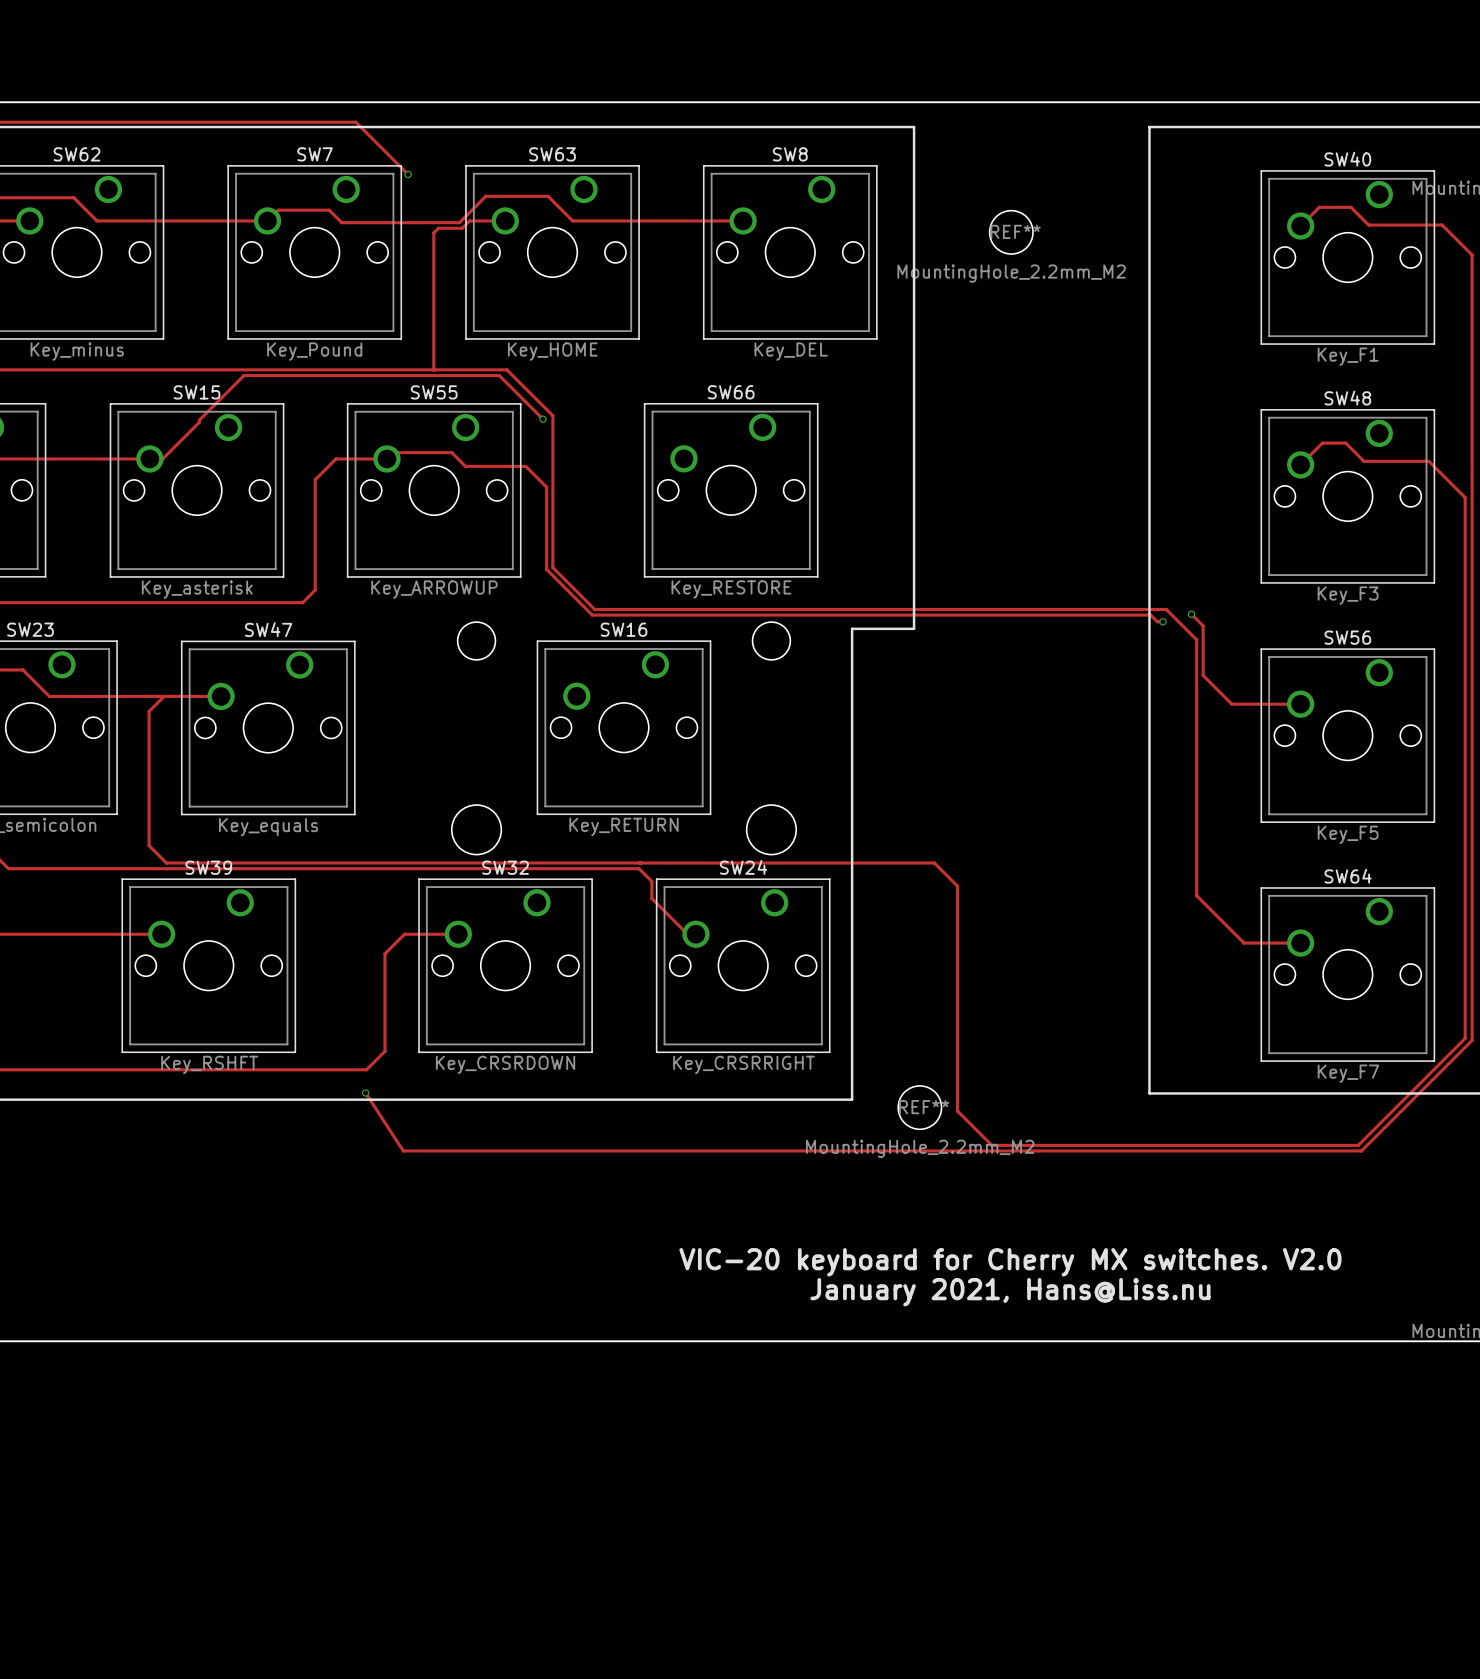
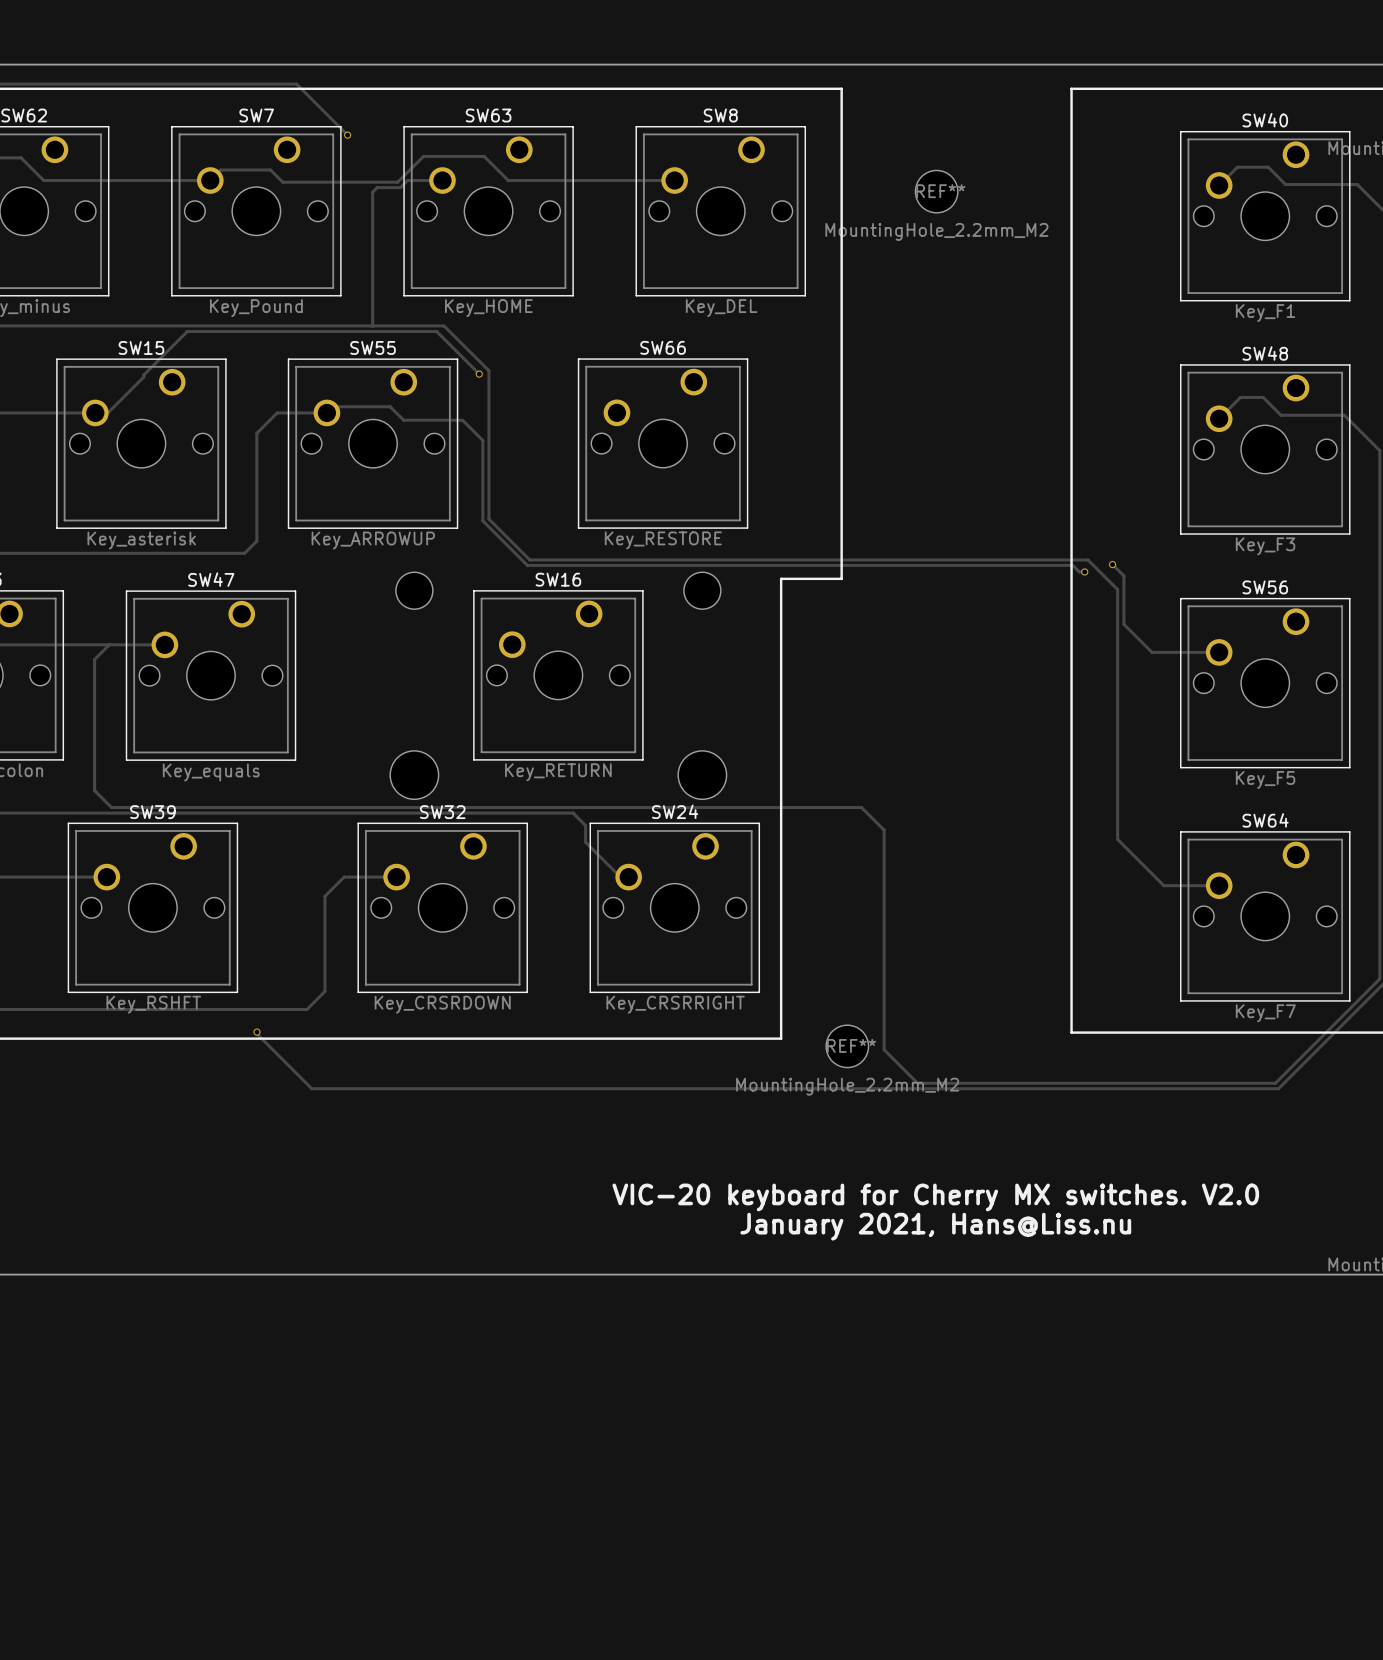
track: (365, 1092) (403, 1150) -> (256, 1032) (311, 1088) (342, 1088)
via position: (365, 1092) -> (256, 1032)

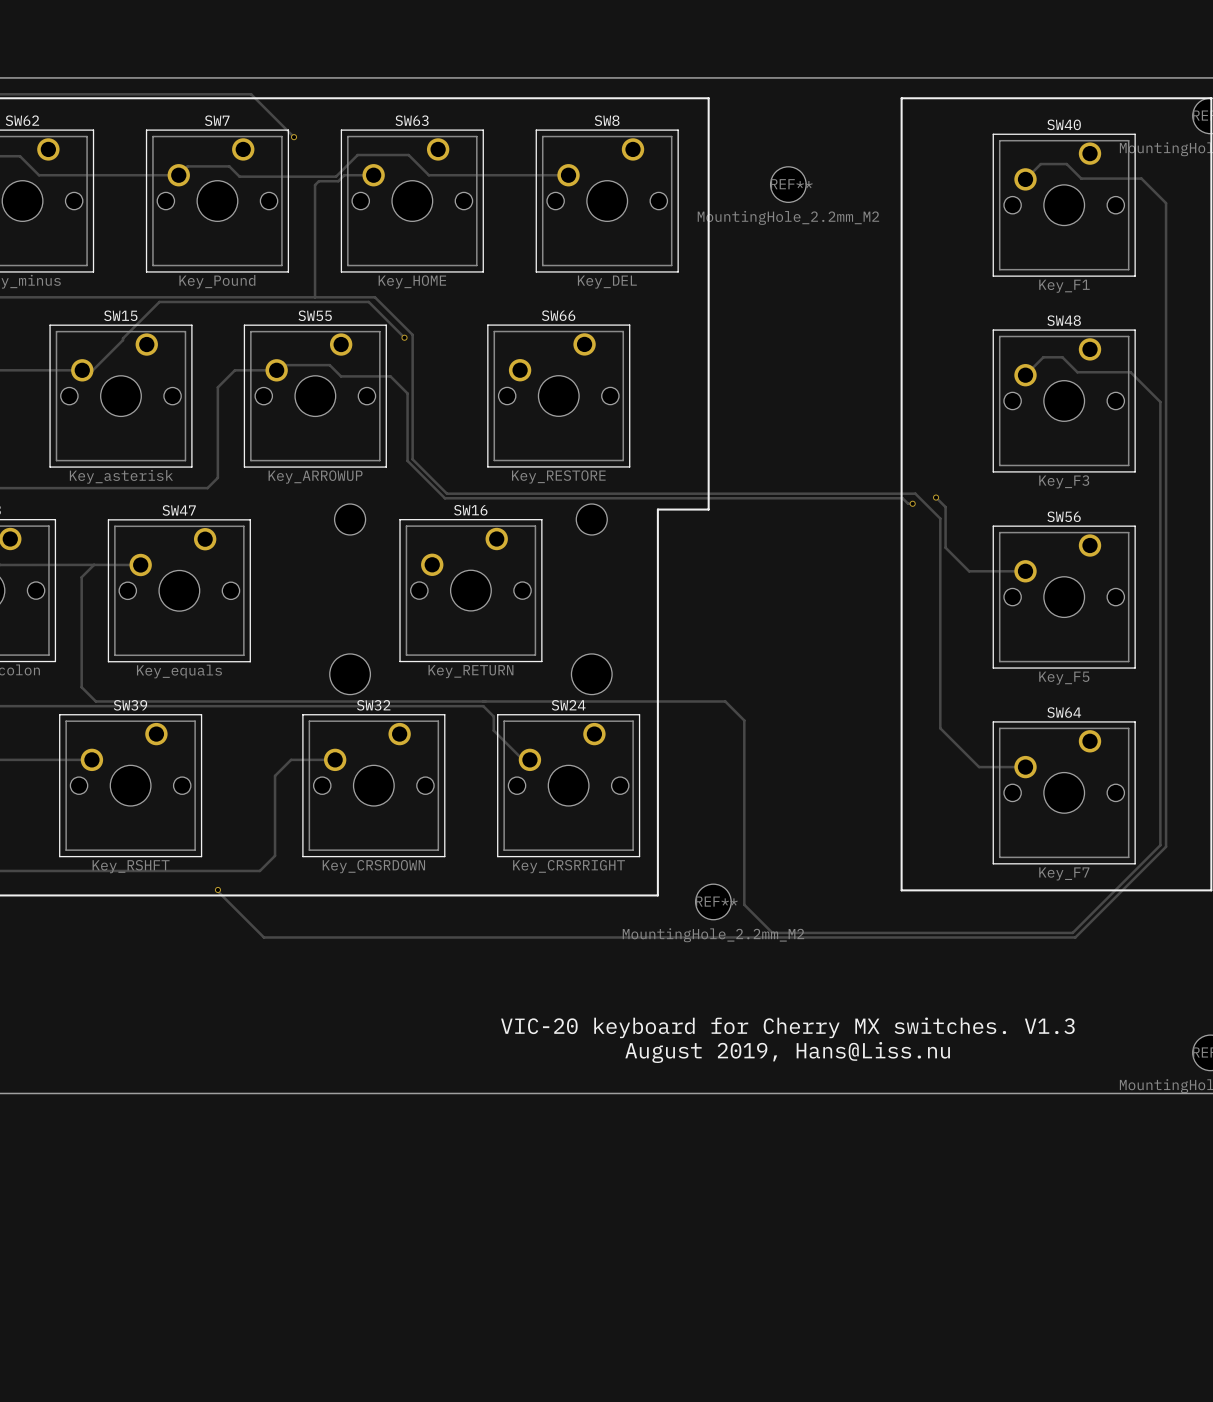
text: VIC-20 keyboard for Cherry MX switches. V2.0 (935, 1197) -> VIC-20 keyboard for Cherry MX switches. V1.3 (787, 1027)
text: January 2021, Hans@Liss.nu (935, 1226) -> August 2019, Hans@Liss.nu (787, 1052)

